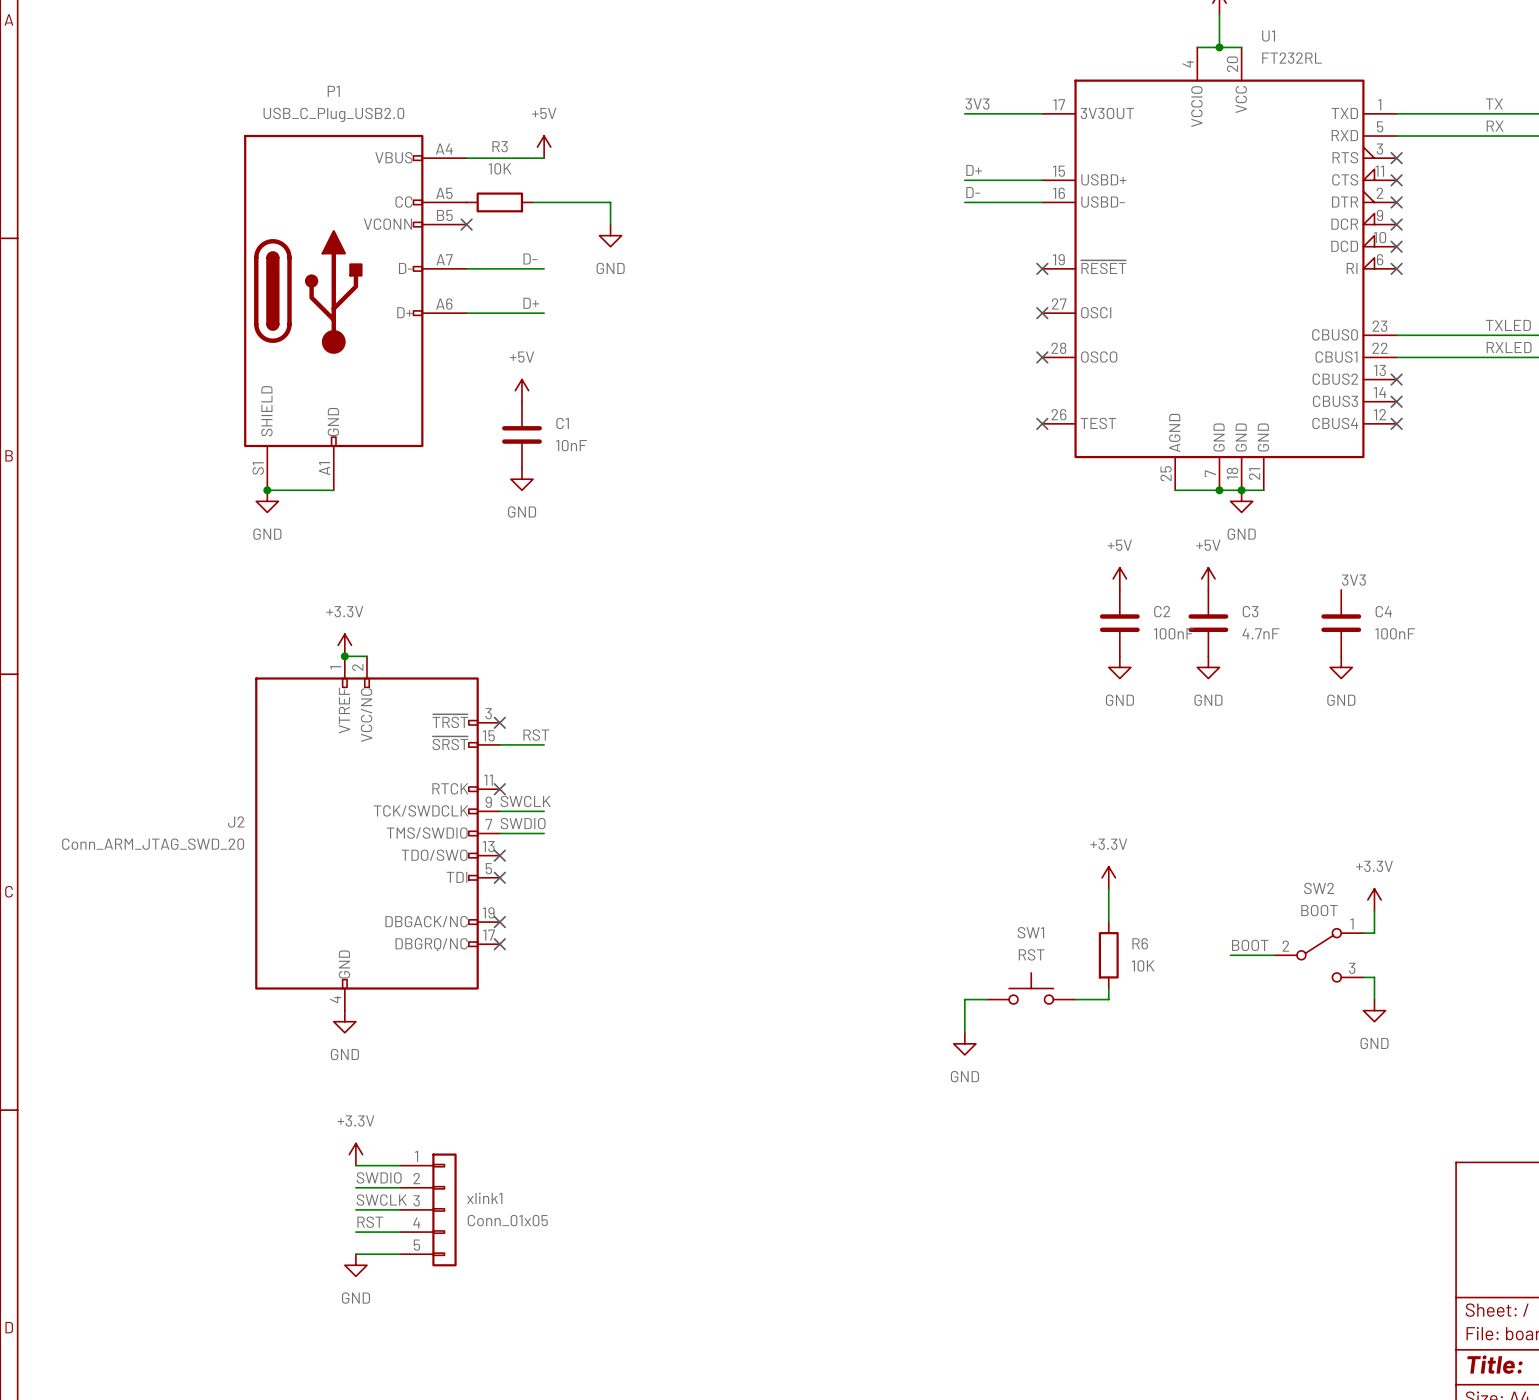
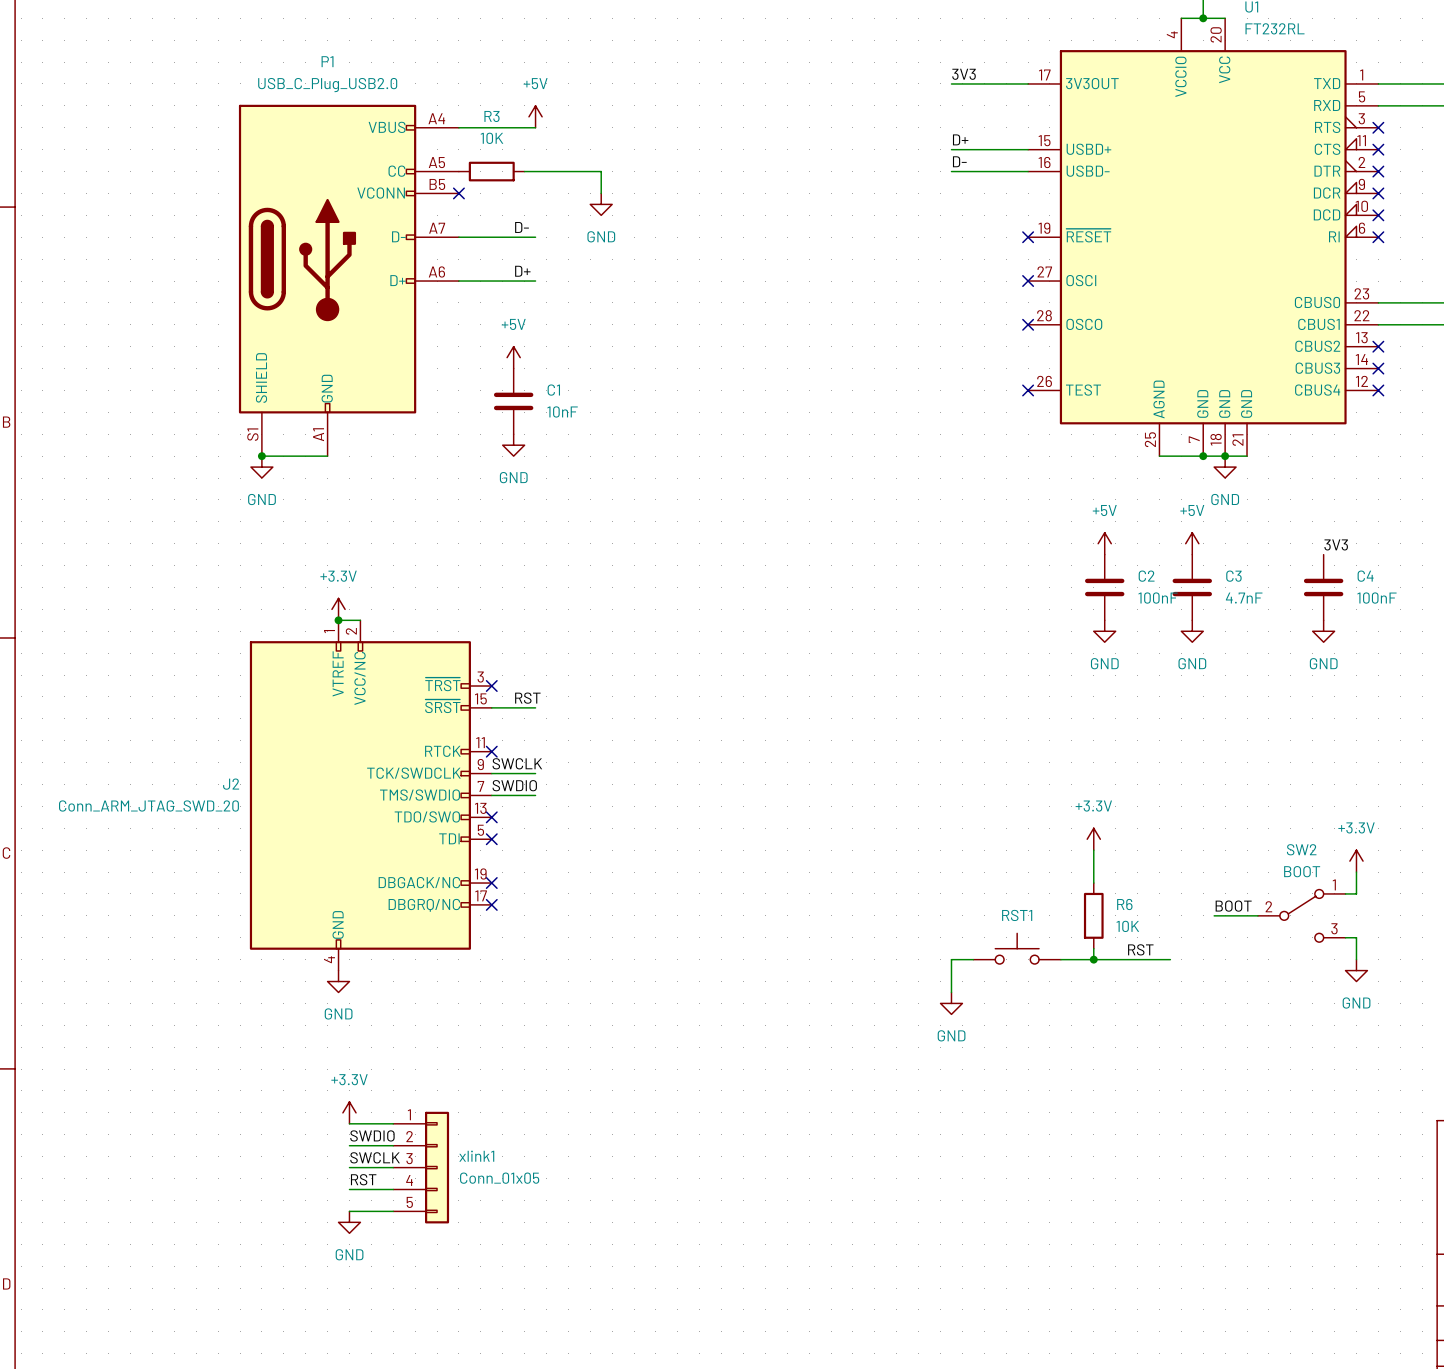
SW1 name: SW1 (1030, 932) -> RST1 (1017, 915)
SW1 value: RST (1031, 954) -> none
label: none -> RST (1140, 949)
wire: none -> (1093, 959) (1170, 959)
junction: none -> (1093, 959)

